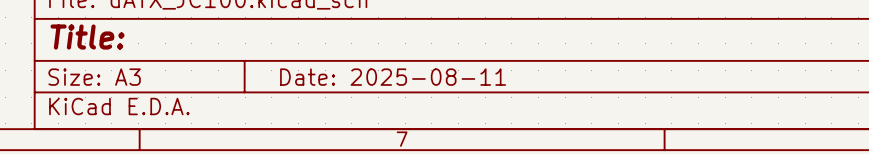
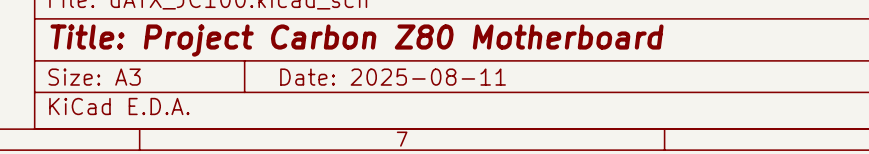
title block: Title: (87, 37) -> Title: Project Carbon Z80 Motherboard (357, 40)

